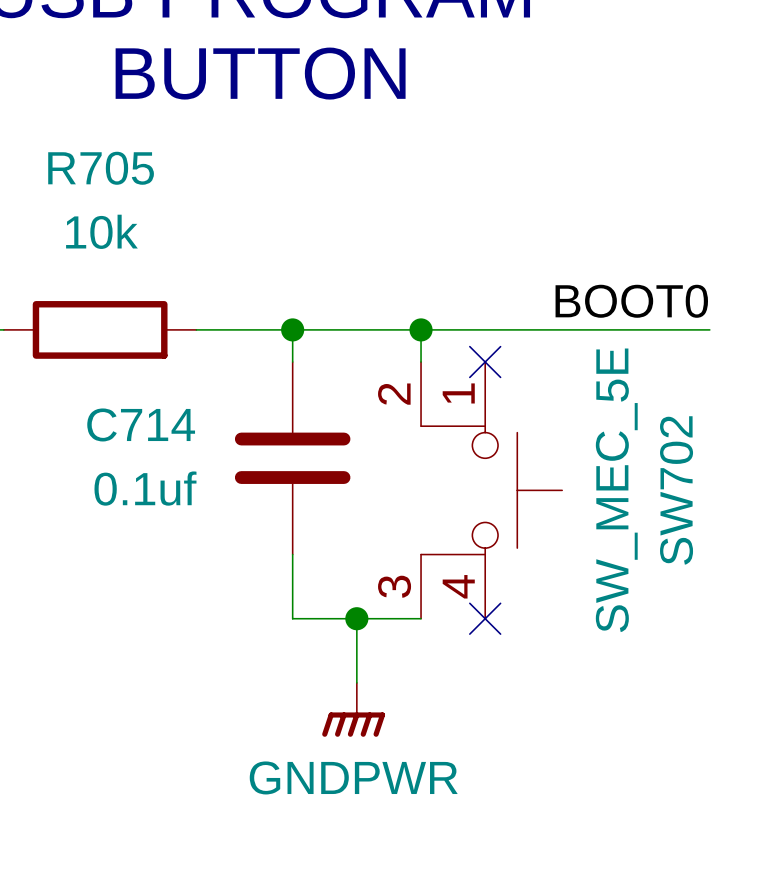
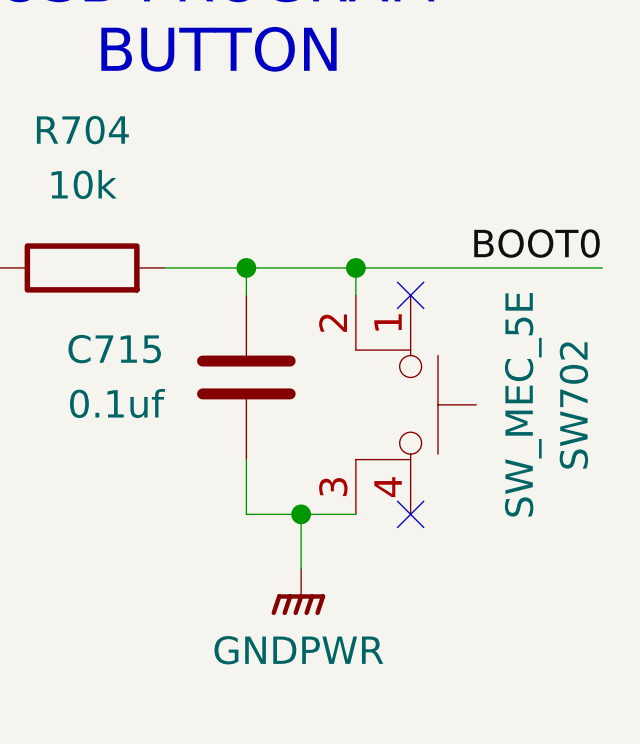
R705 name: R705 (101, 168) -> R704 (82, 130)
C714 name: C714 (141, 424) -> C715 (114, 349)

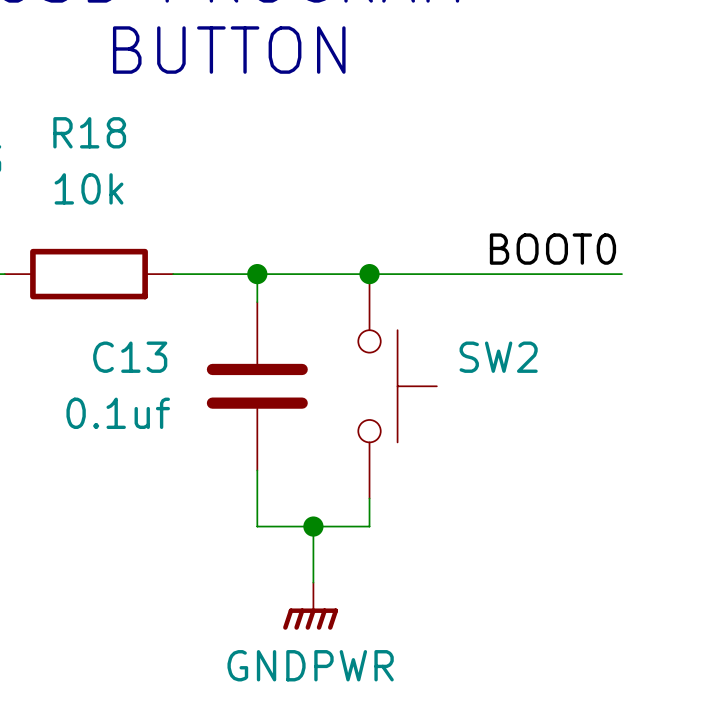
R704 name: R704 (82, 130) -> R18 (89, 132)
no-connect mark: (410, 295) -> none
C715 name: C715 (114, 349) -> C13 (130, 357)
SW2: none -> (397, 386)
SW702: SW_MEC_5E (416, 404) -> none
no-connect mark: (410, 514) -> none

